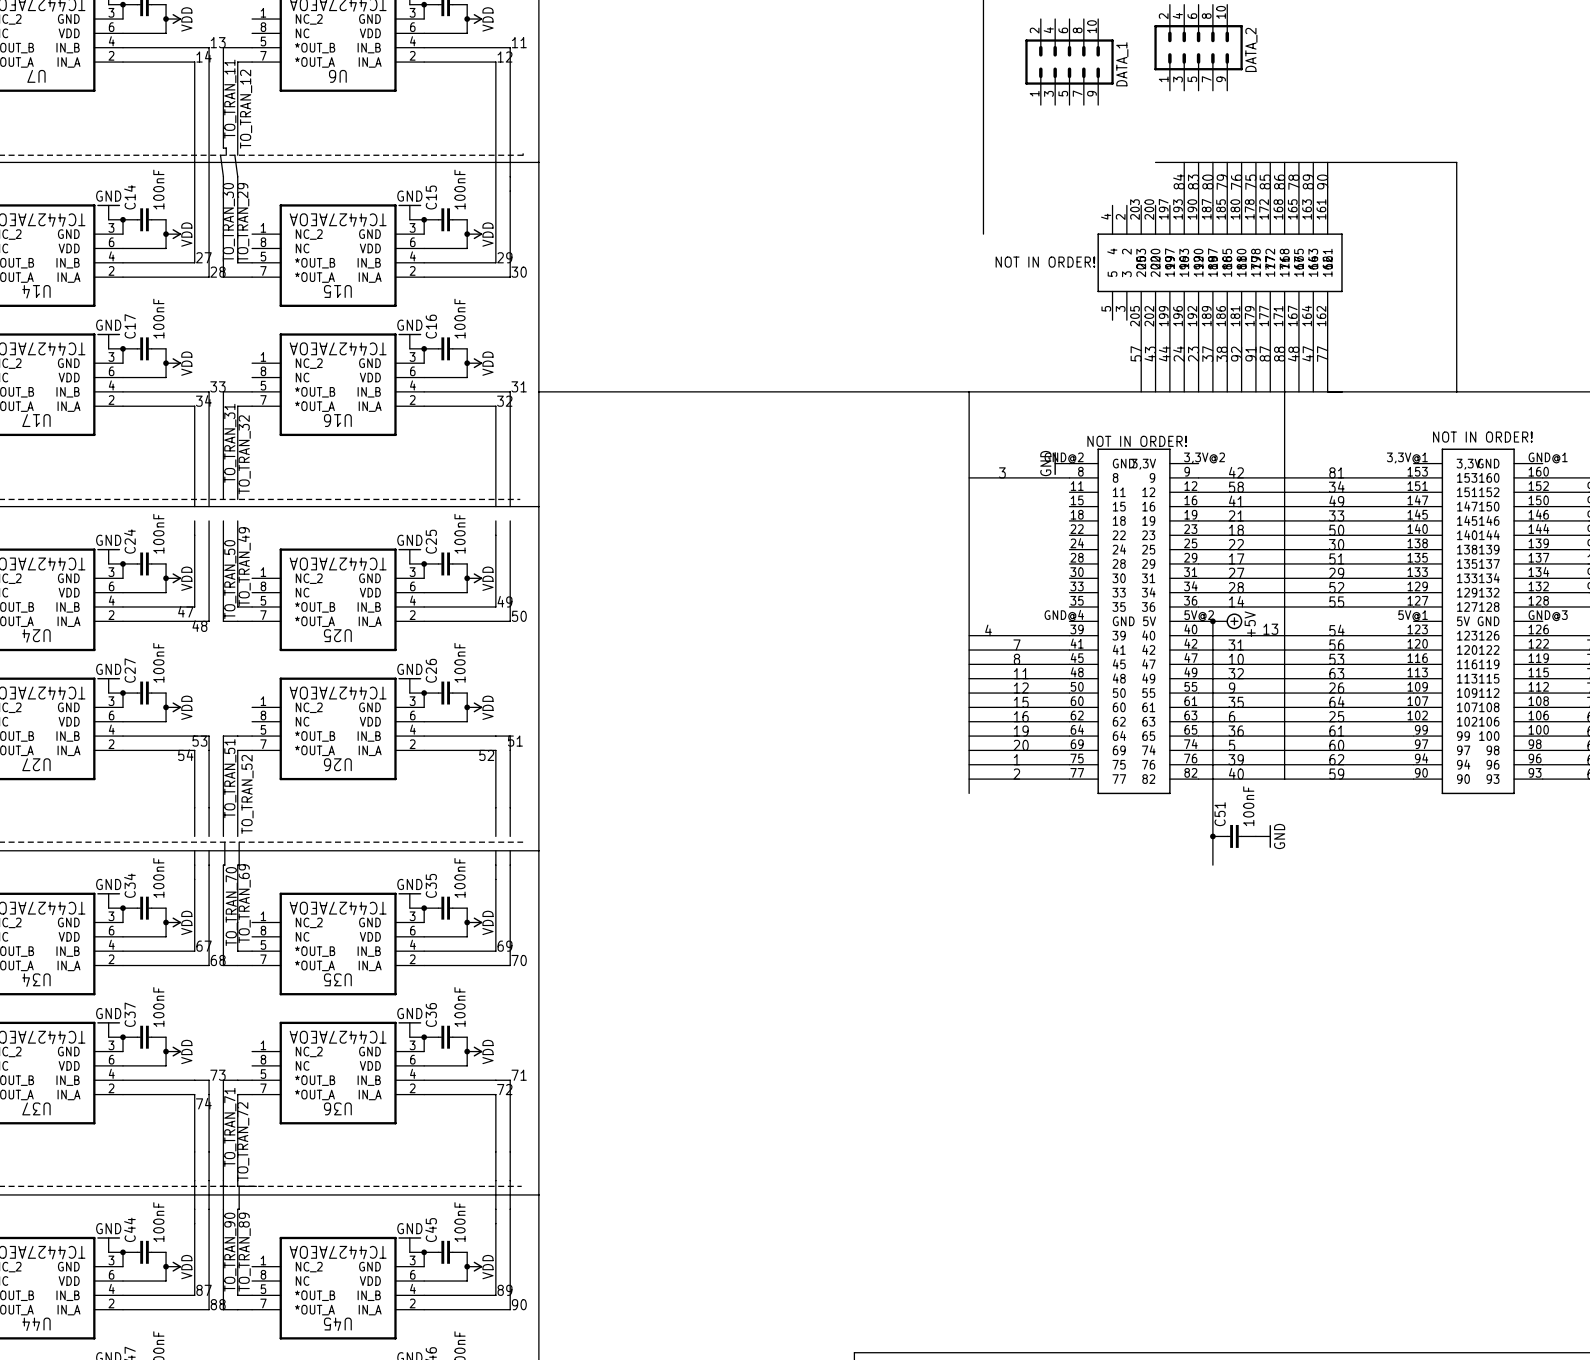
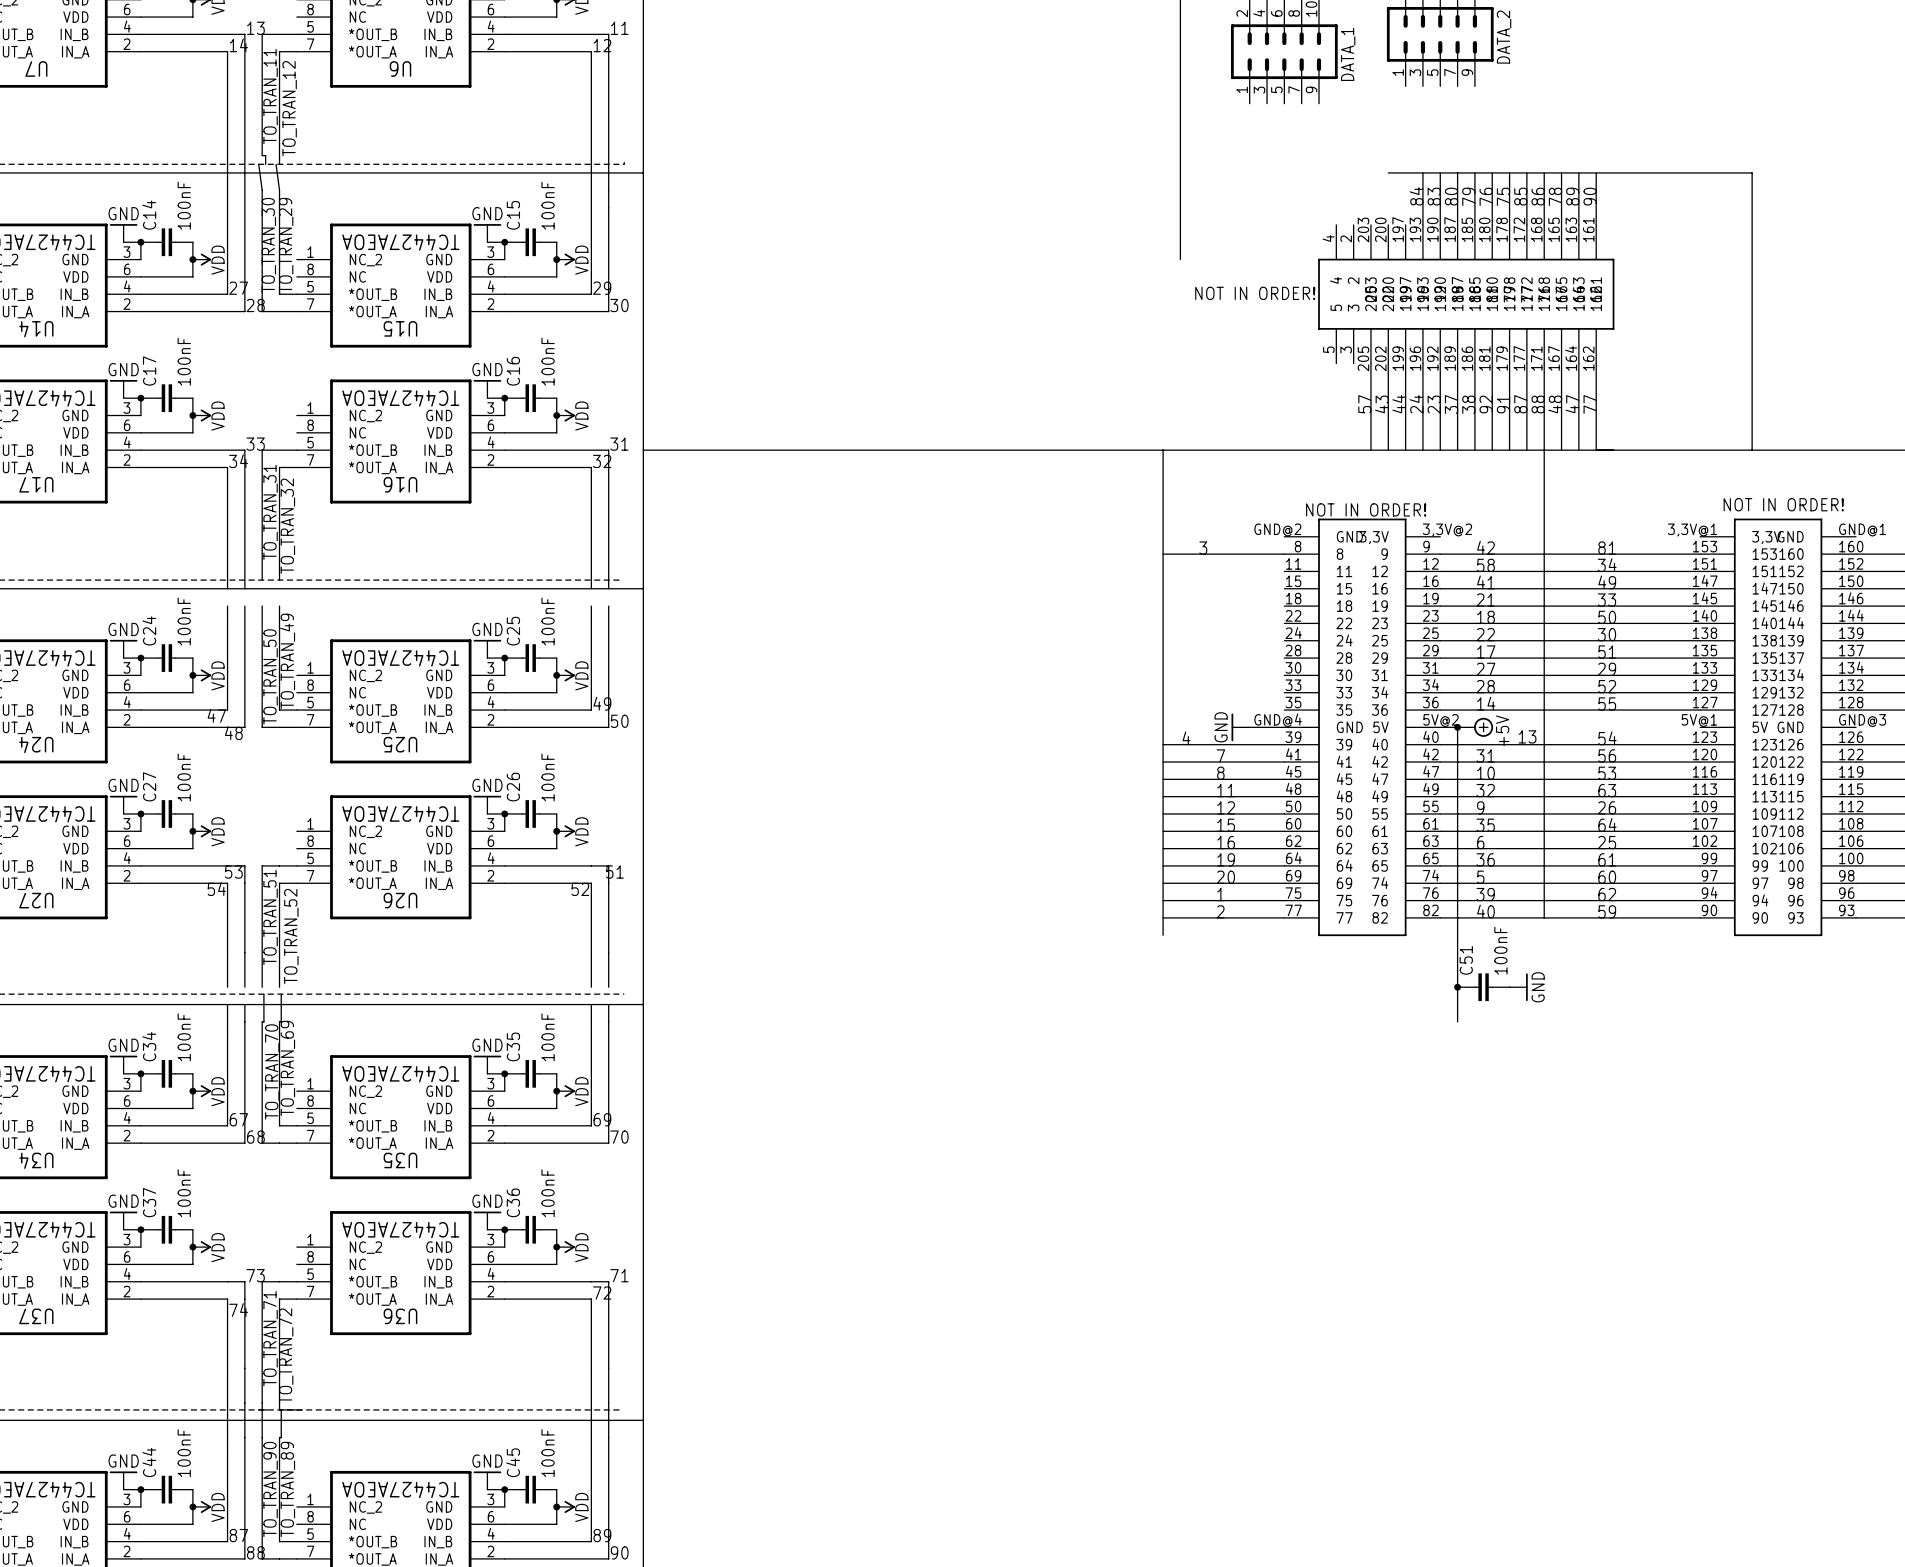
power symbol: GND (1061, 463) -> none
power symbol: none -> GND (1240, 727)
wire: none -> (1249, 727) (1284, 727)

